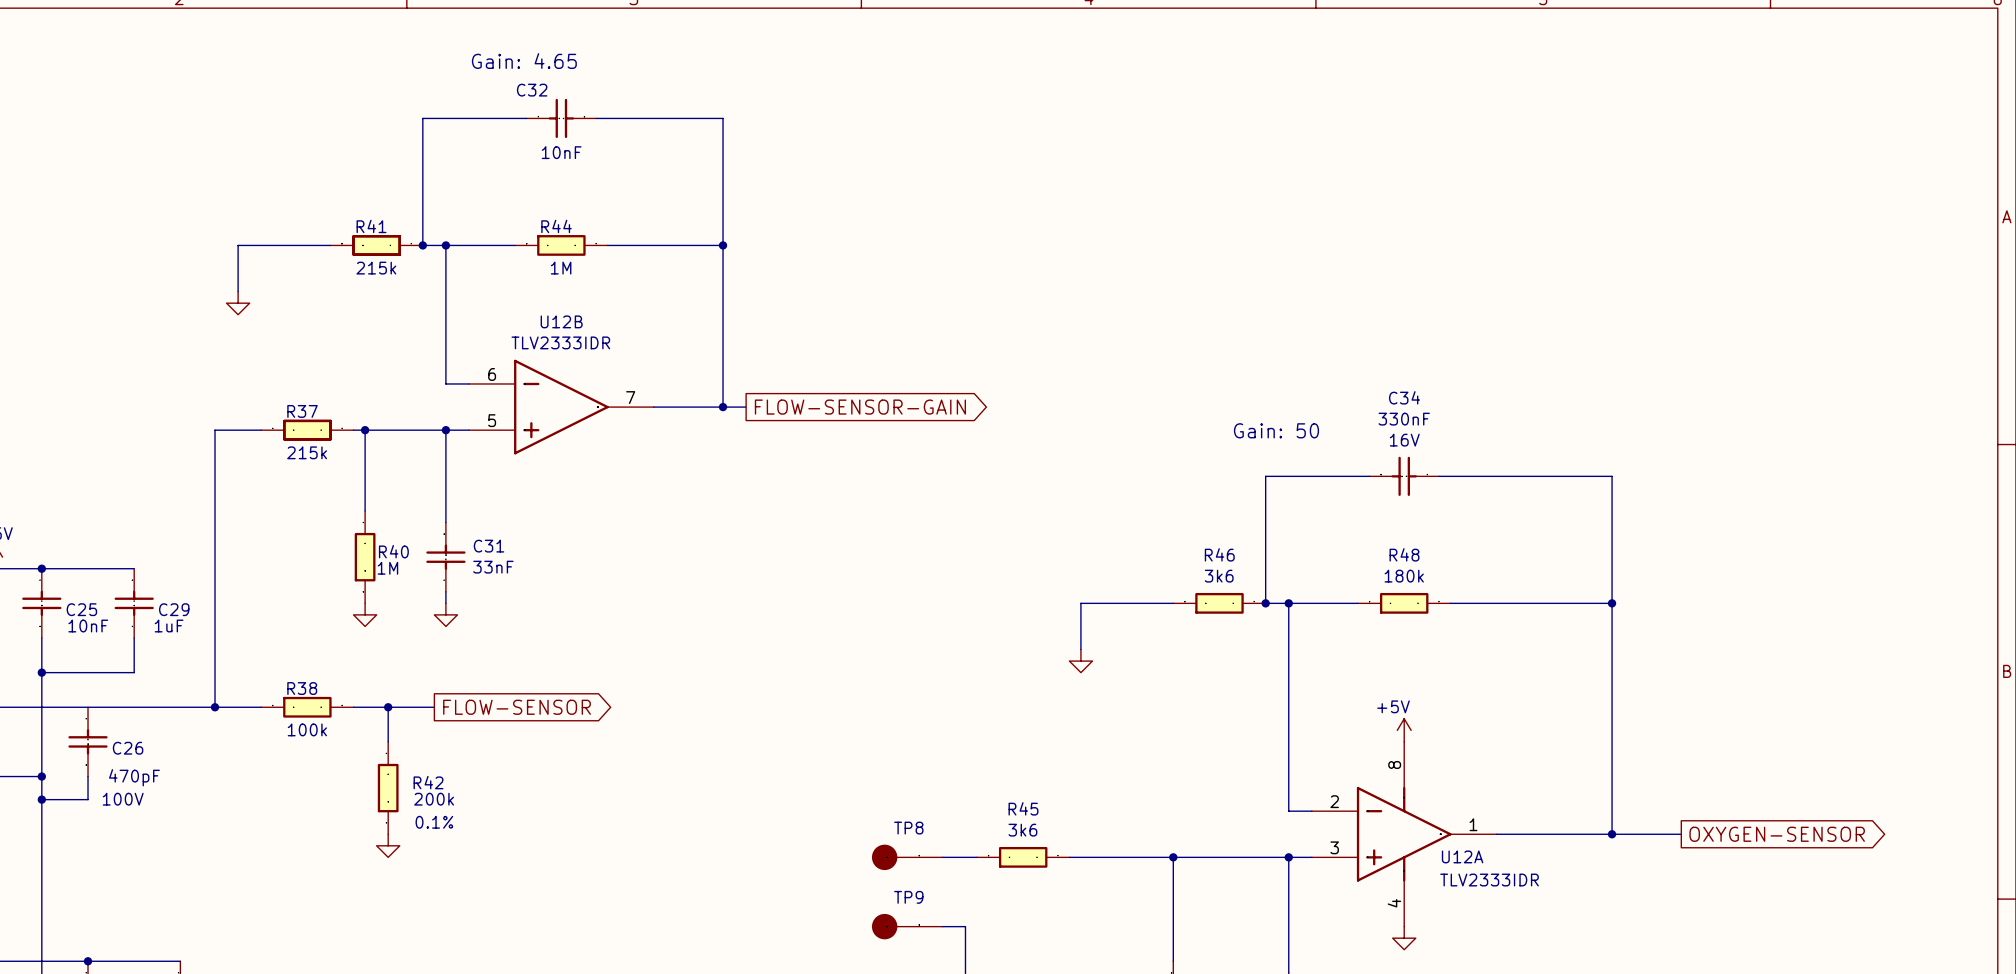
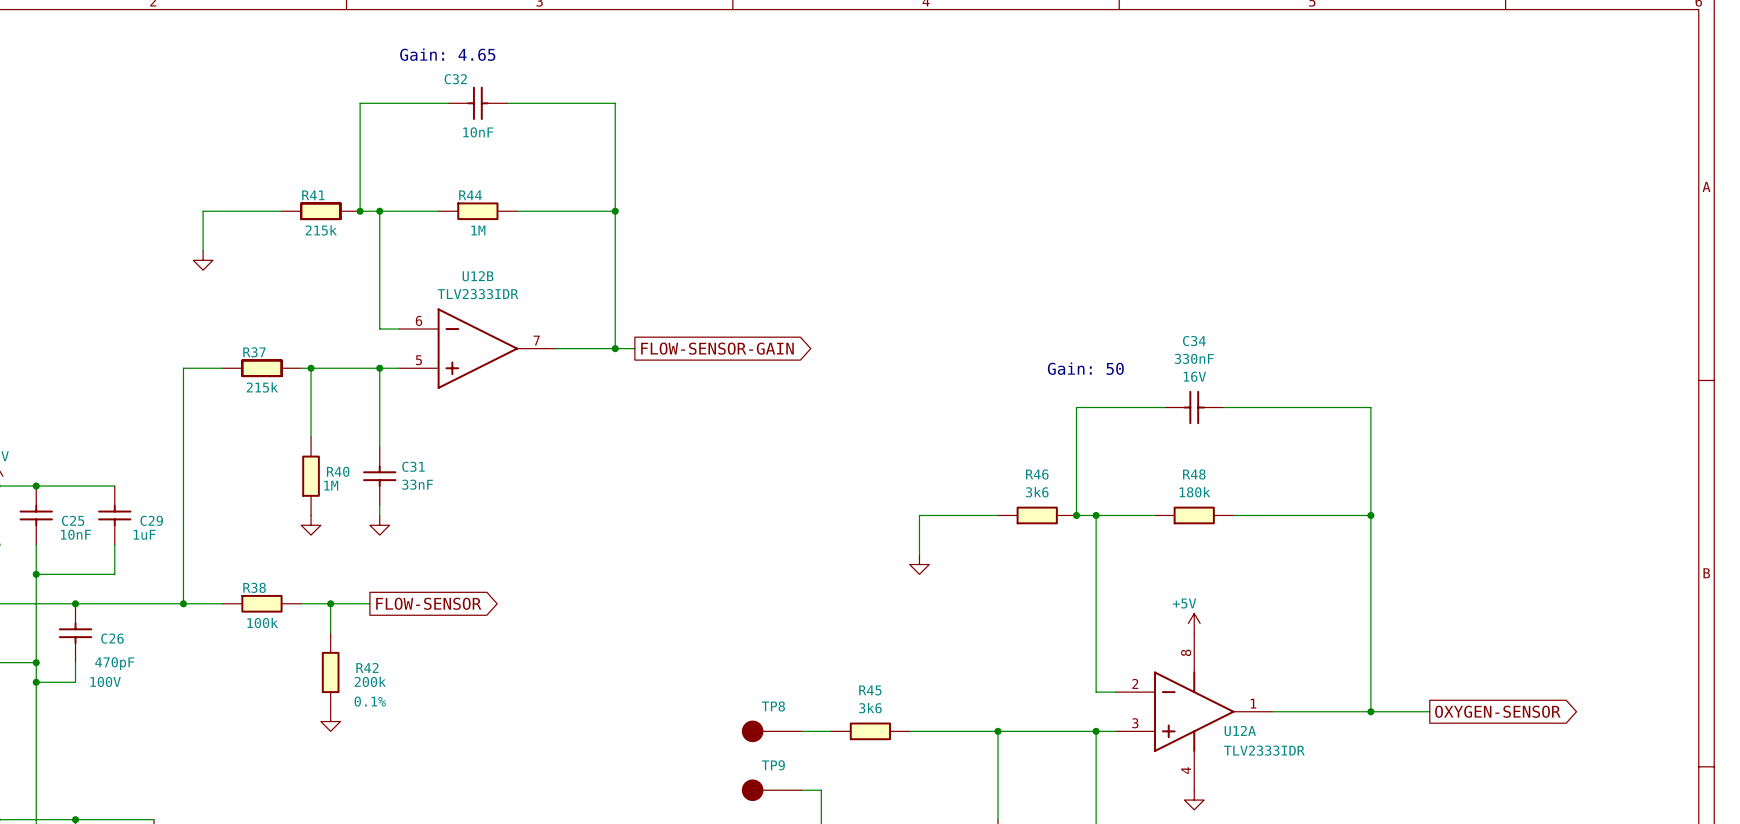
junction: none -> (75, 603)

